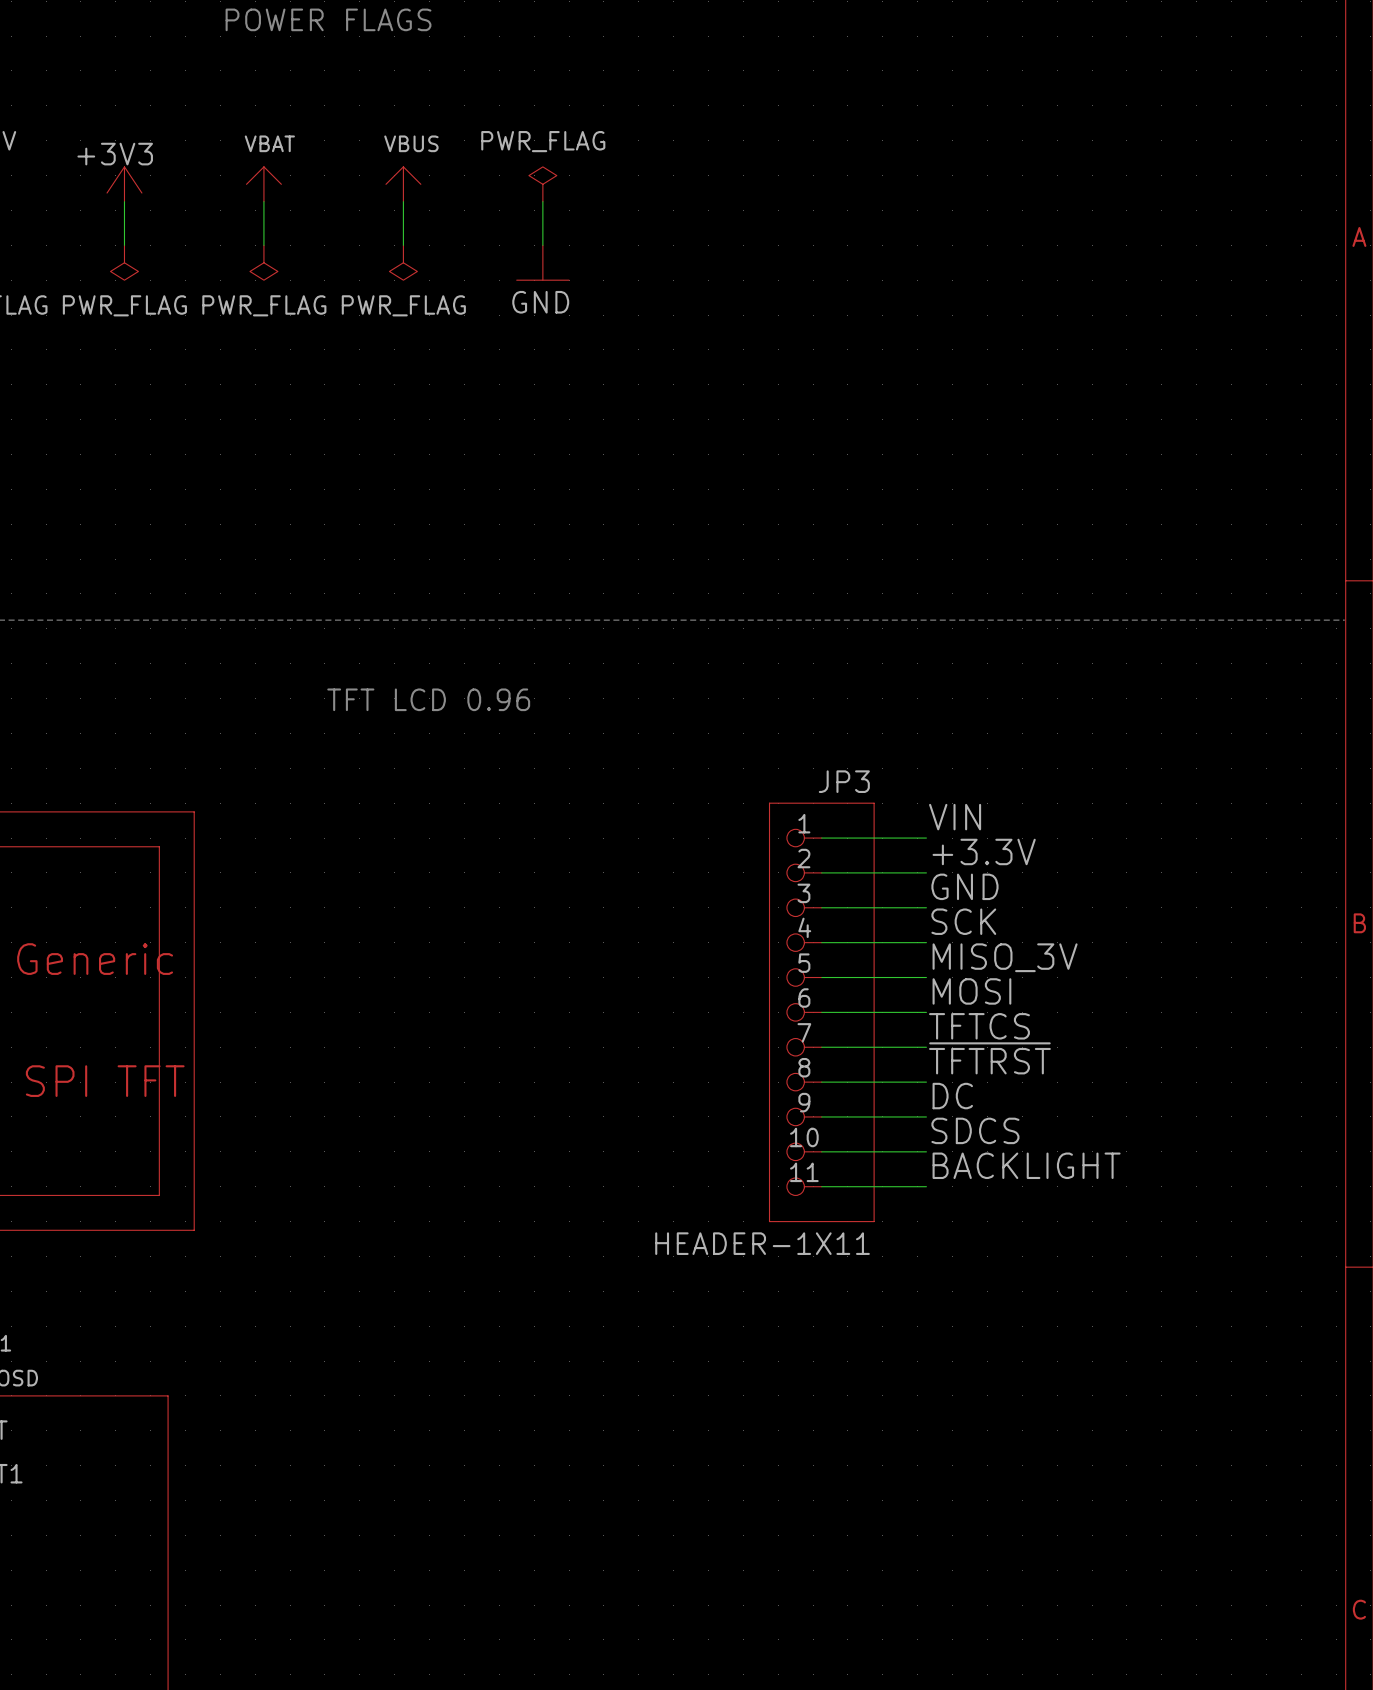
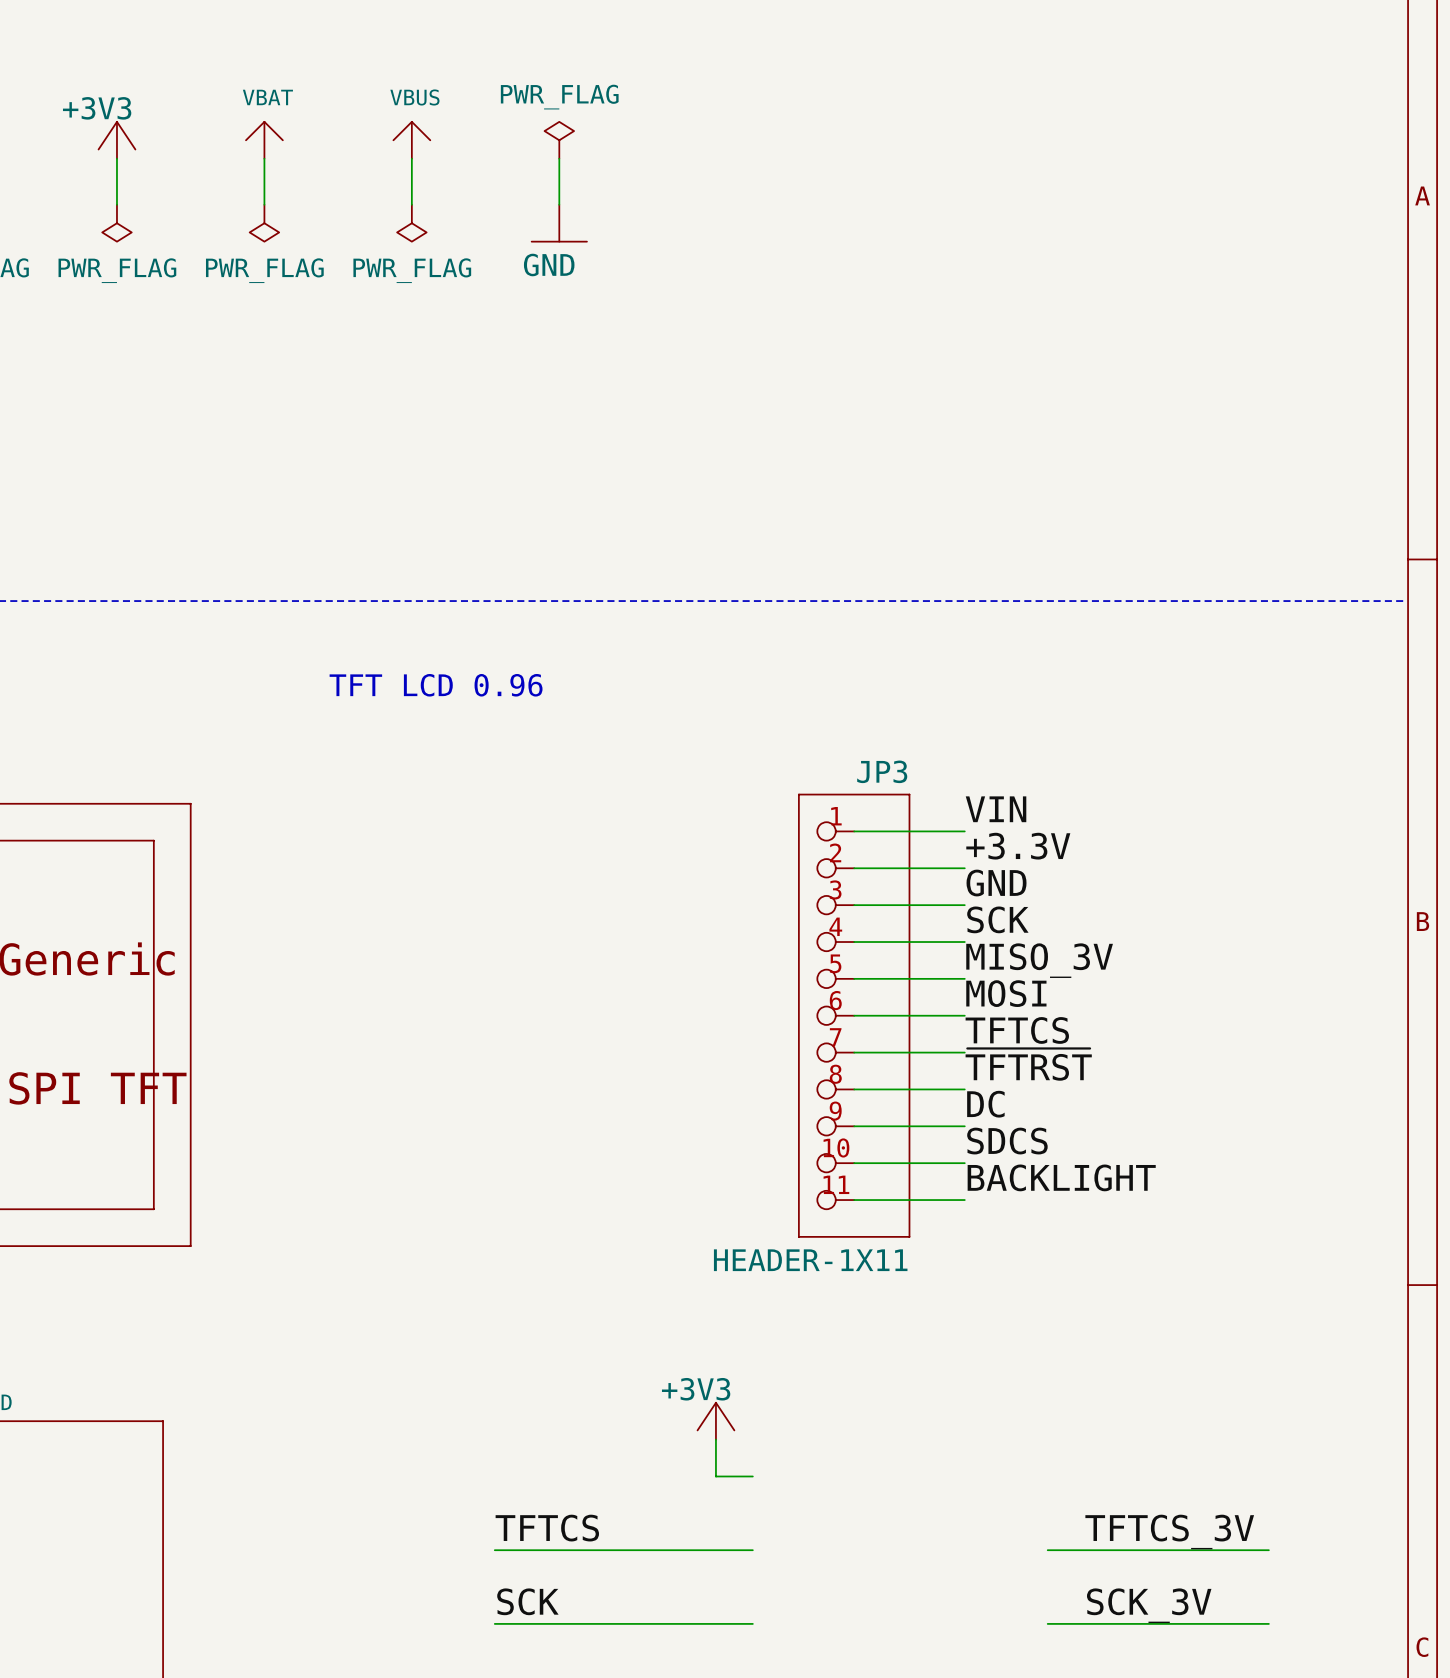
power symbol: none -> +3V3 (715, 1421)
wire: none -> (715, 1439) (715, 1476) (752, 1476)
label: none -> TFTCS (547, 1528)
label: none -> TFTCS_3V (1169, 1532)
wire: none -> (494, 1550) (752, 1550)
wire: none -> (1047, 1550) (1268, 1550)
label: none -> SCK (527, 1601)
label: none -> SCK_3V (1149, 1605)
wire: none -> (494, 1623) (752, 1623)
wire: none -> (1047, 1623) (1268, 1623)

